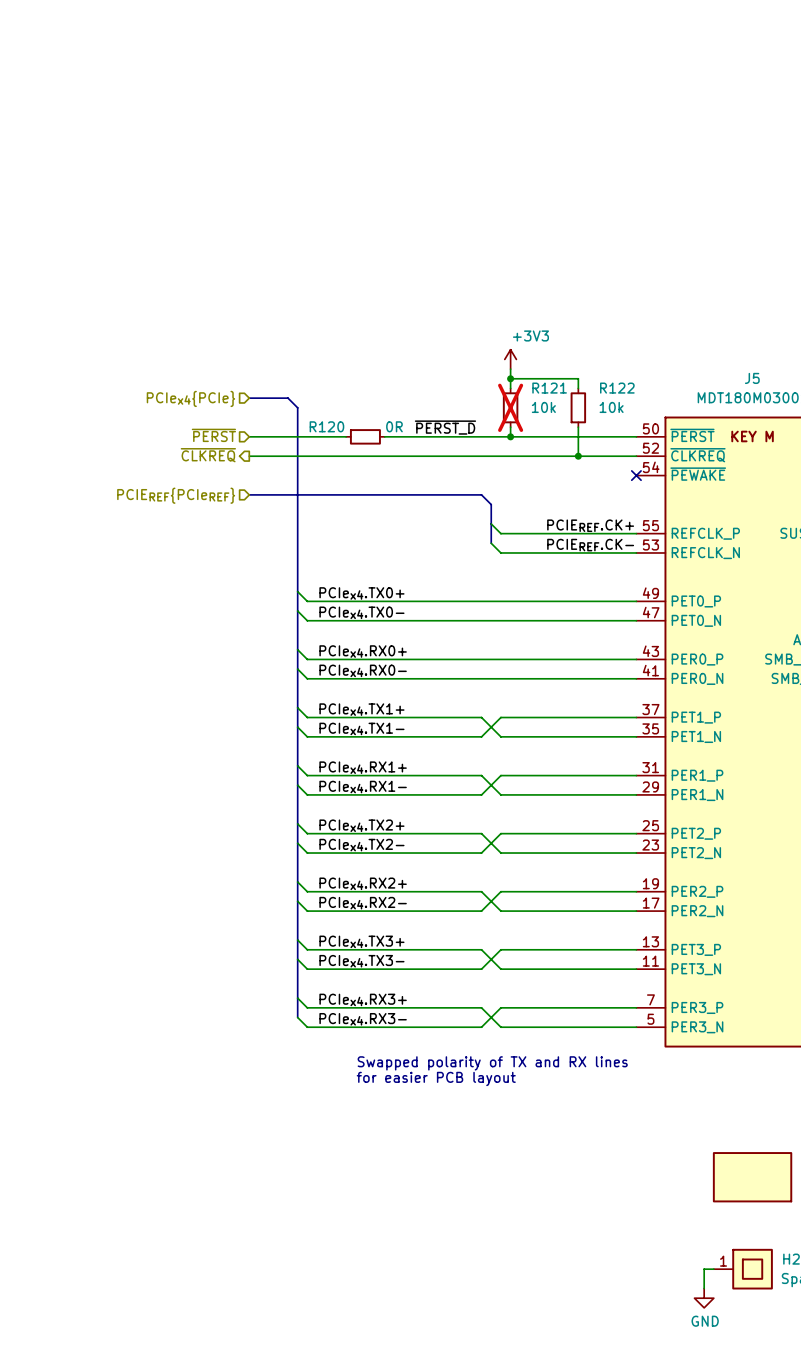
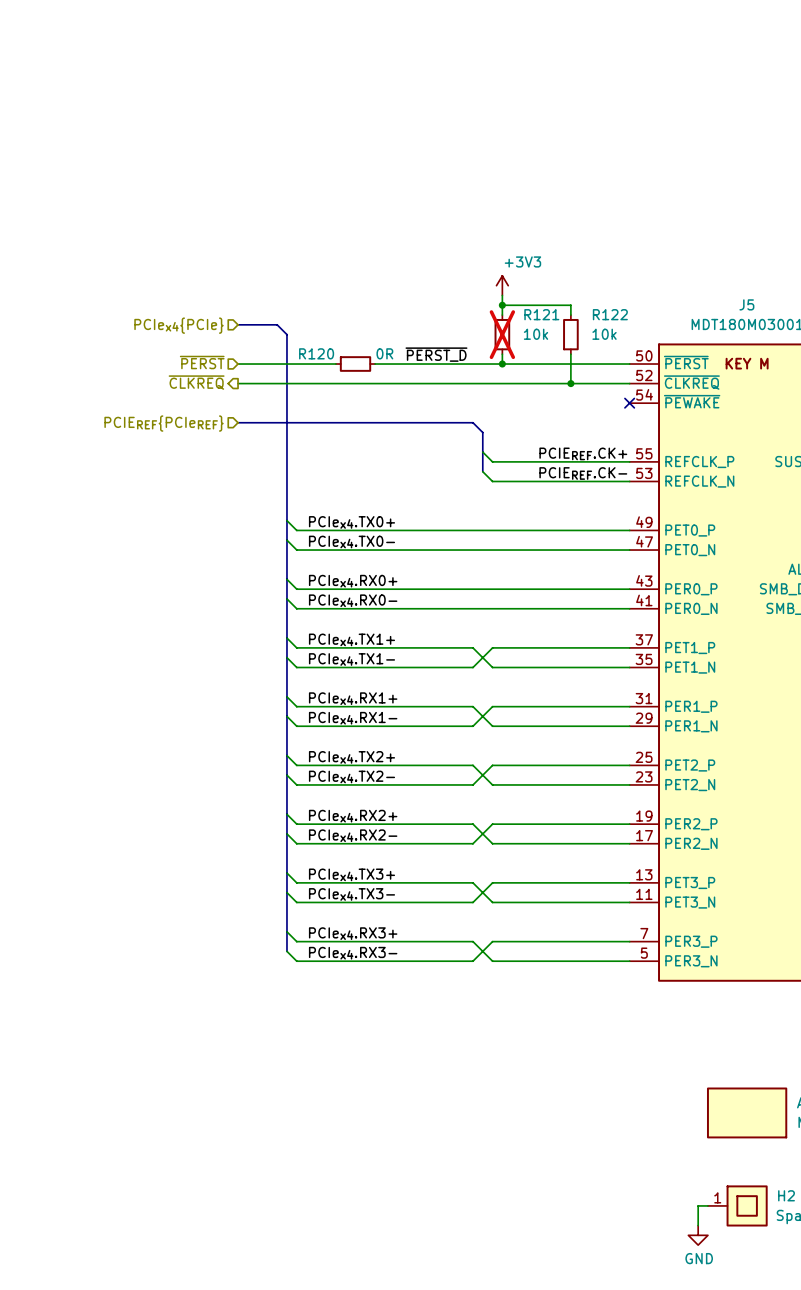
text: Swapped polarity of TX and RX lines (492, 1063) -> none
text: for easier PCB layout (436, 1078) -> none

